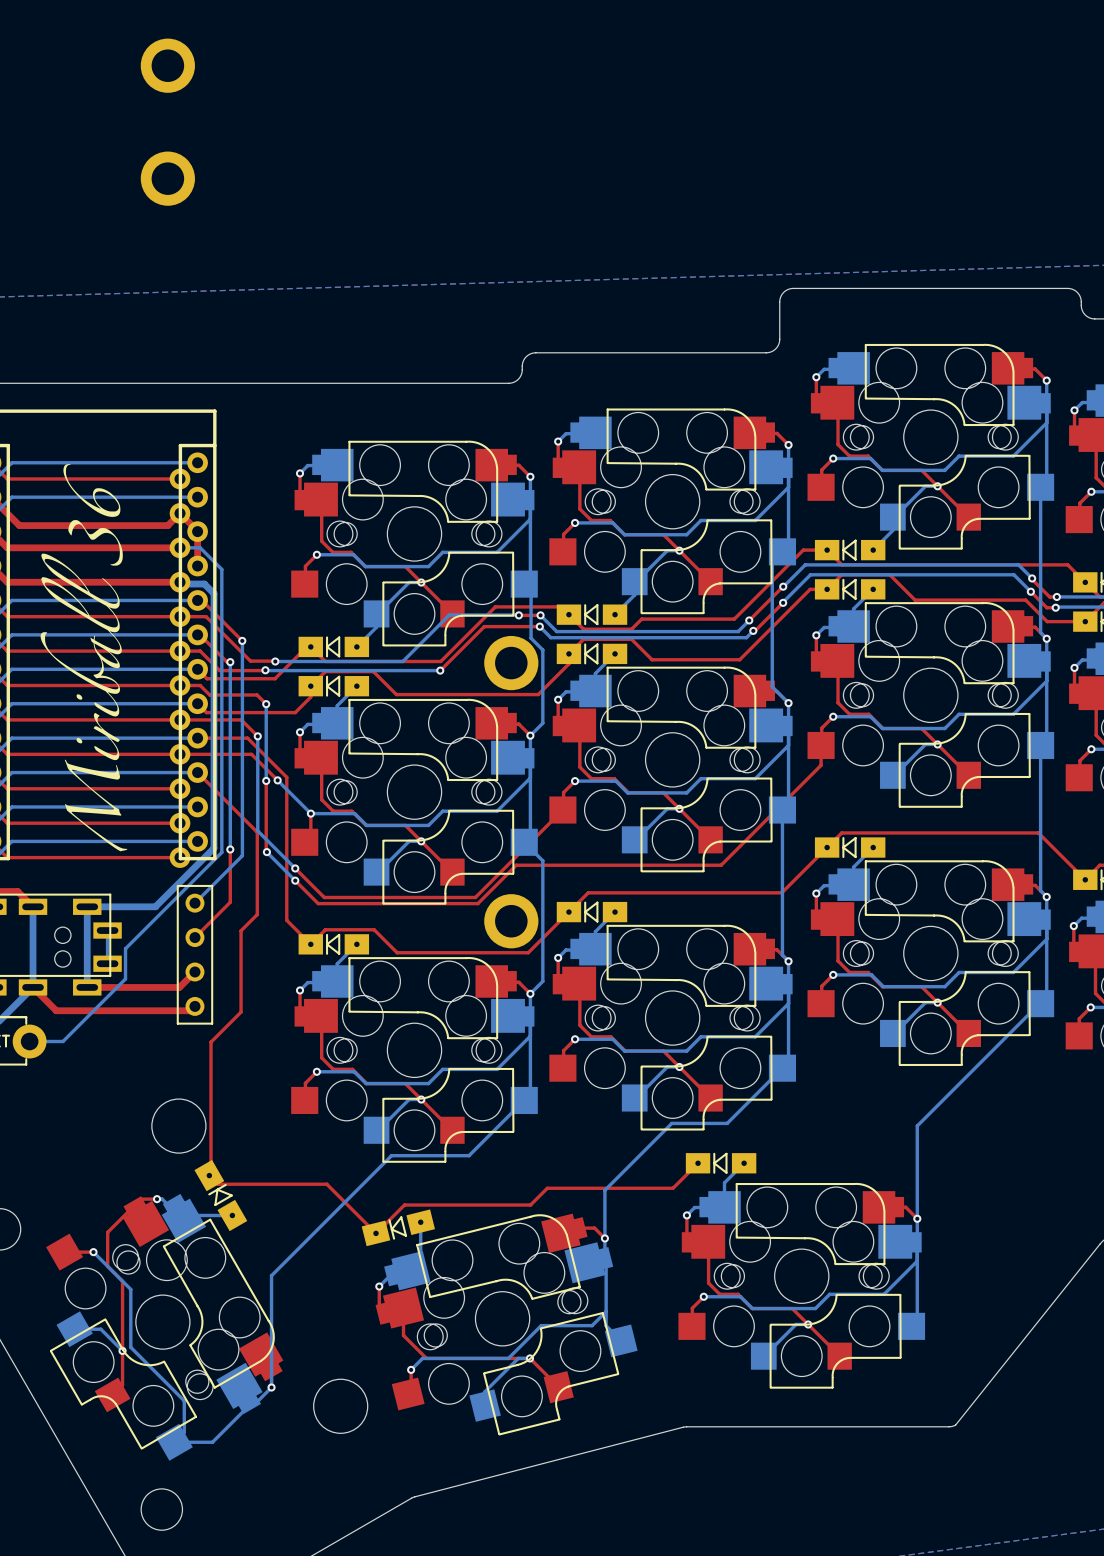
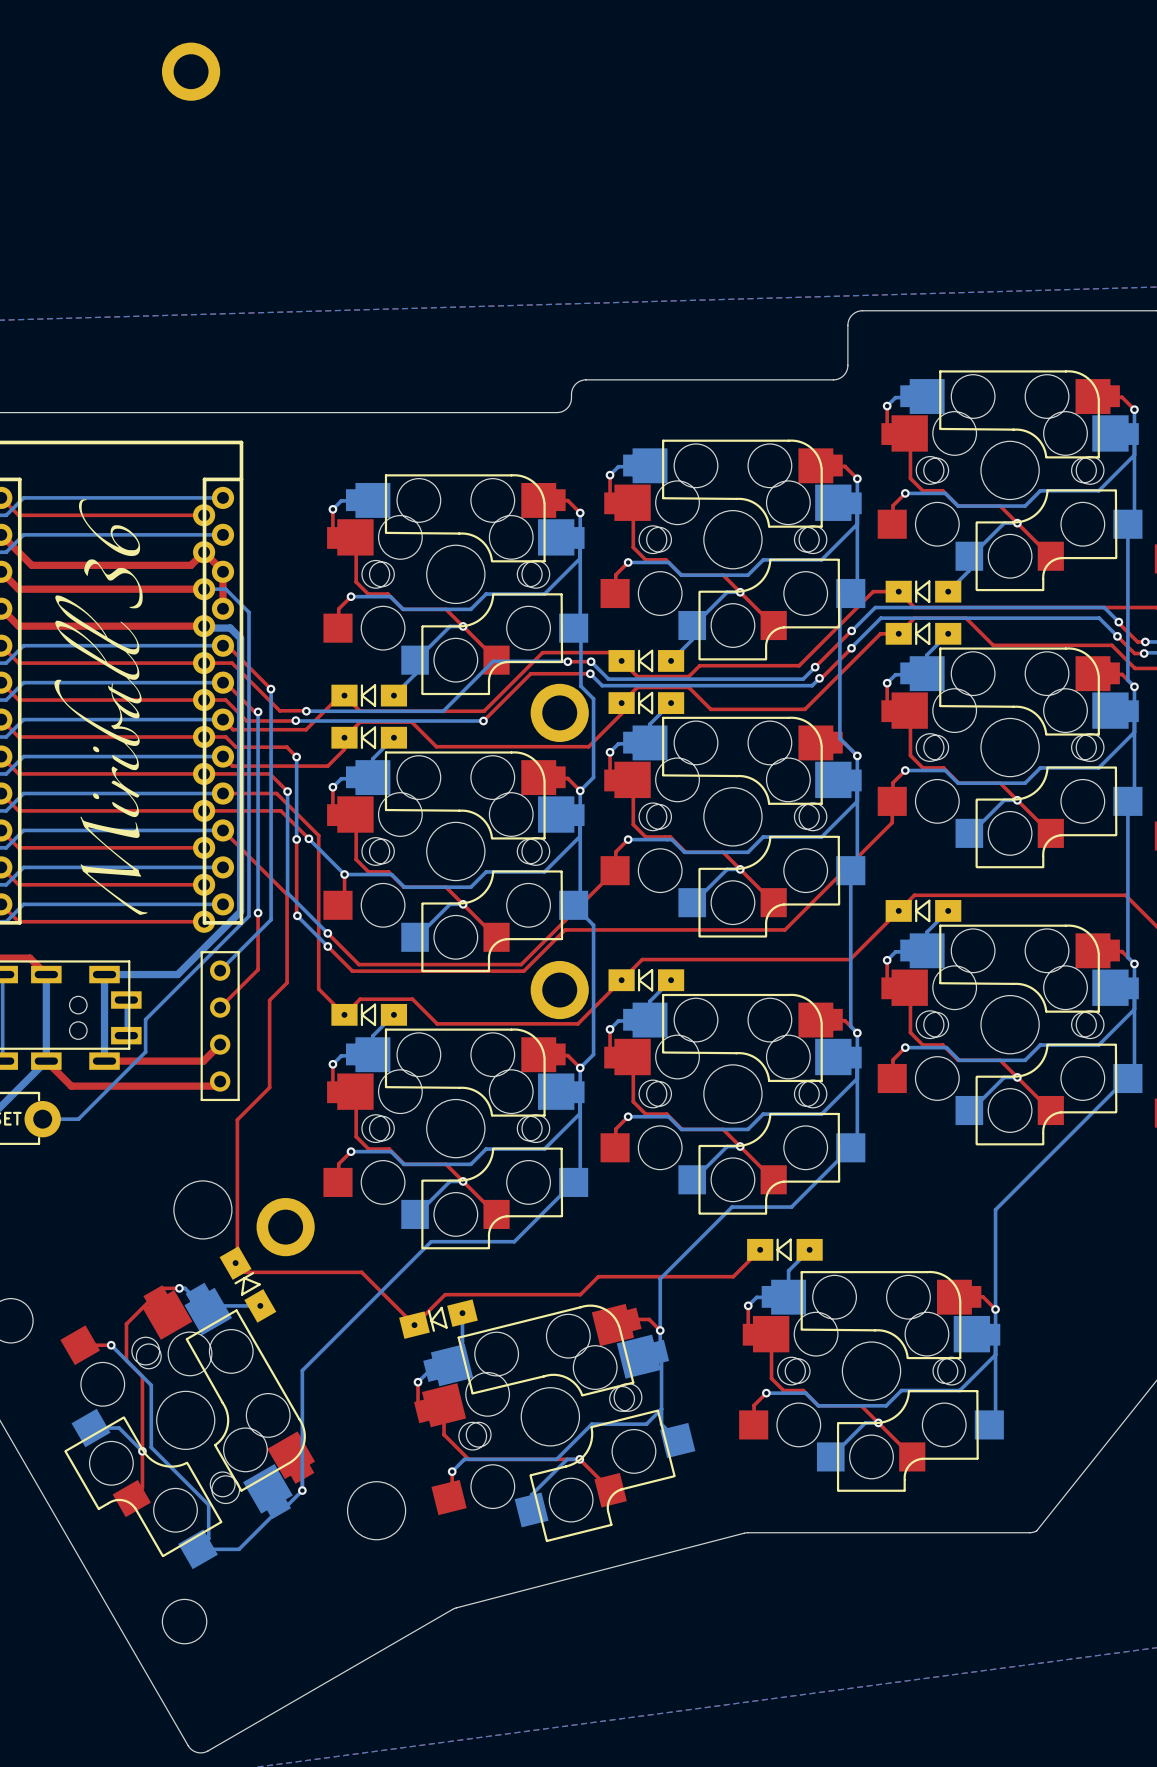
part: (167, 178) -> none
part: none -> (285, 1227)

